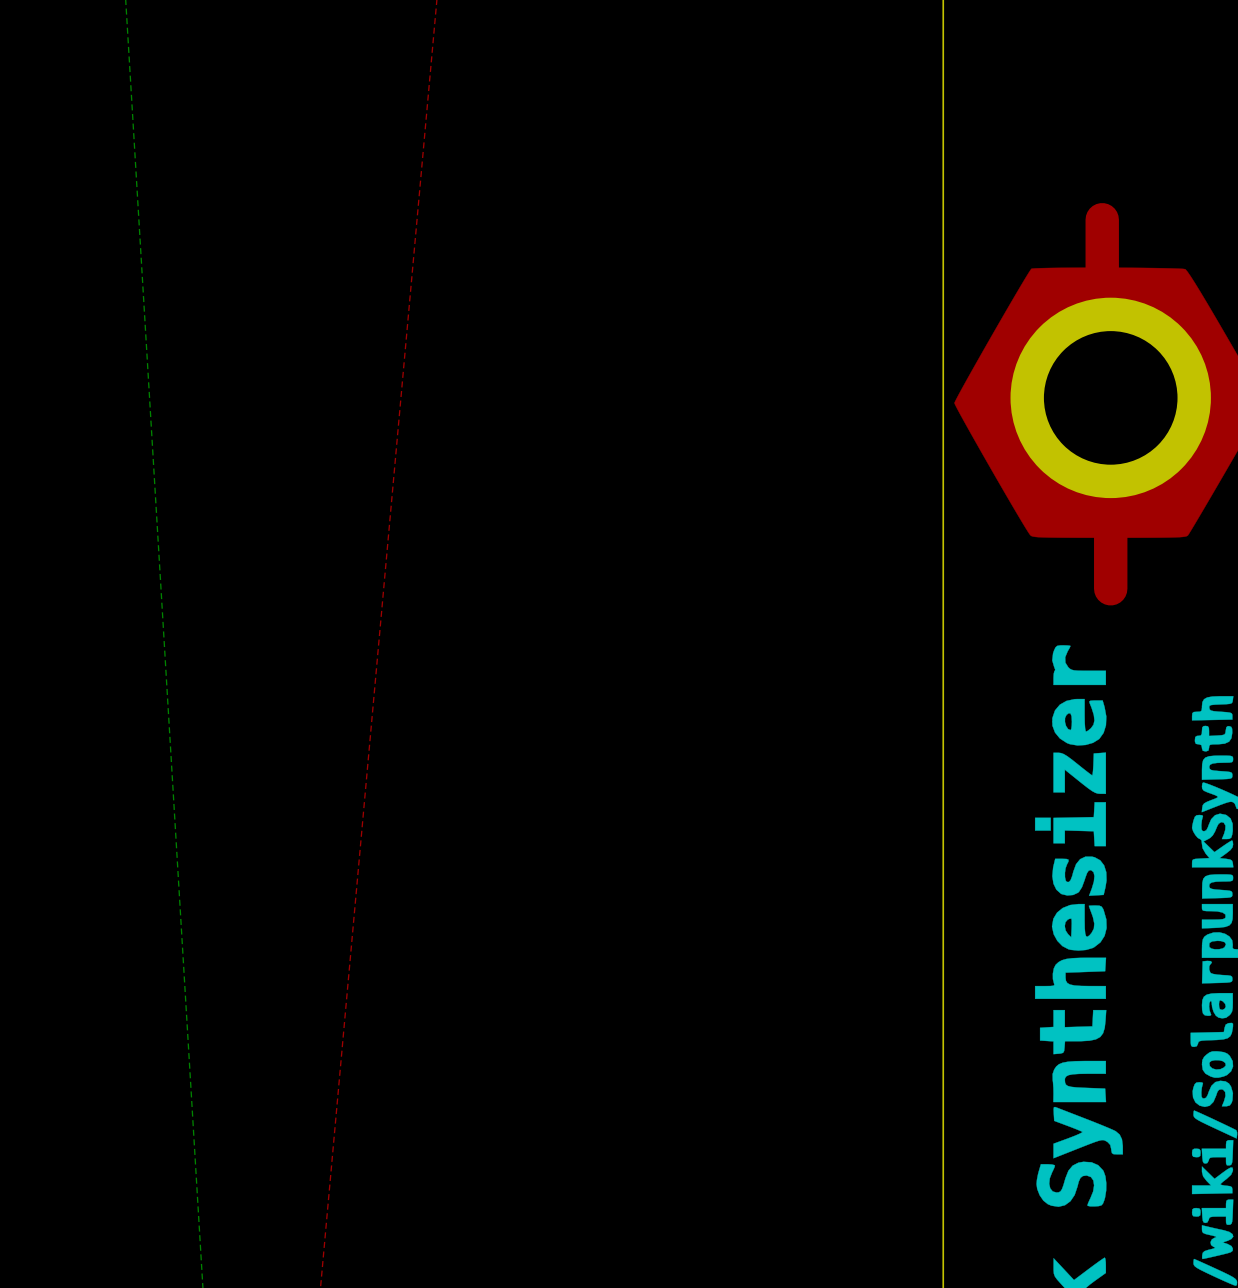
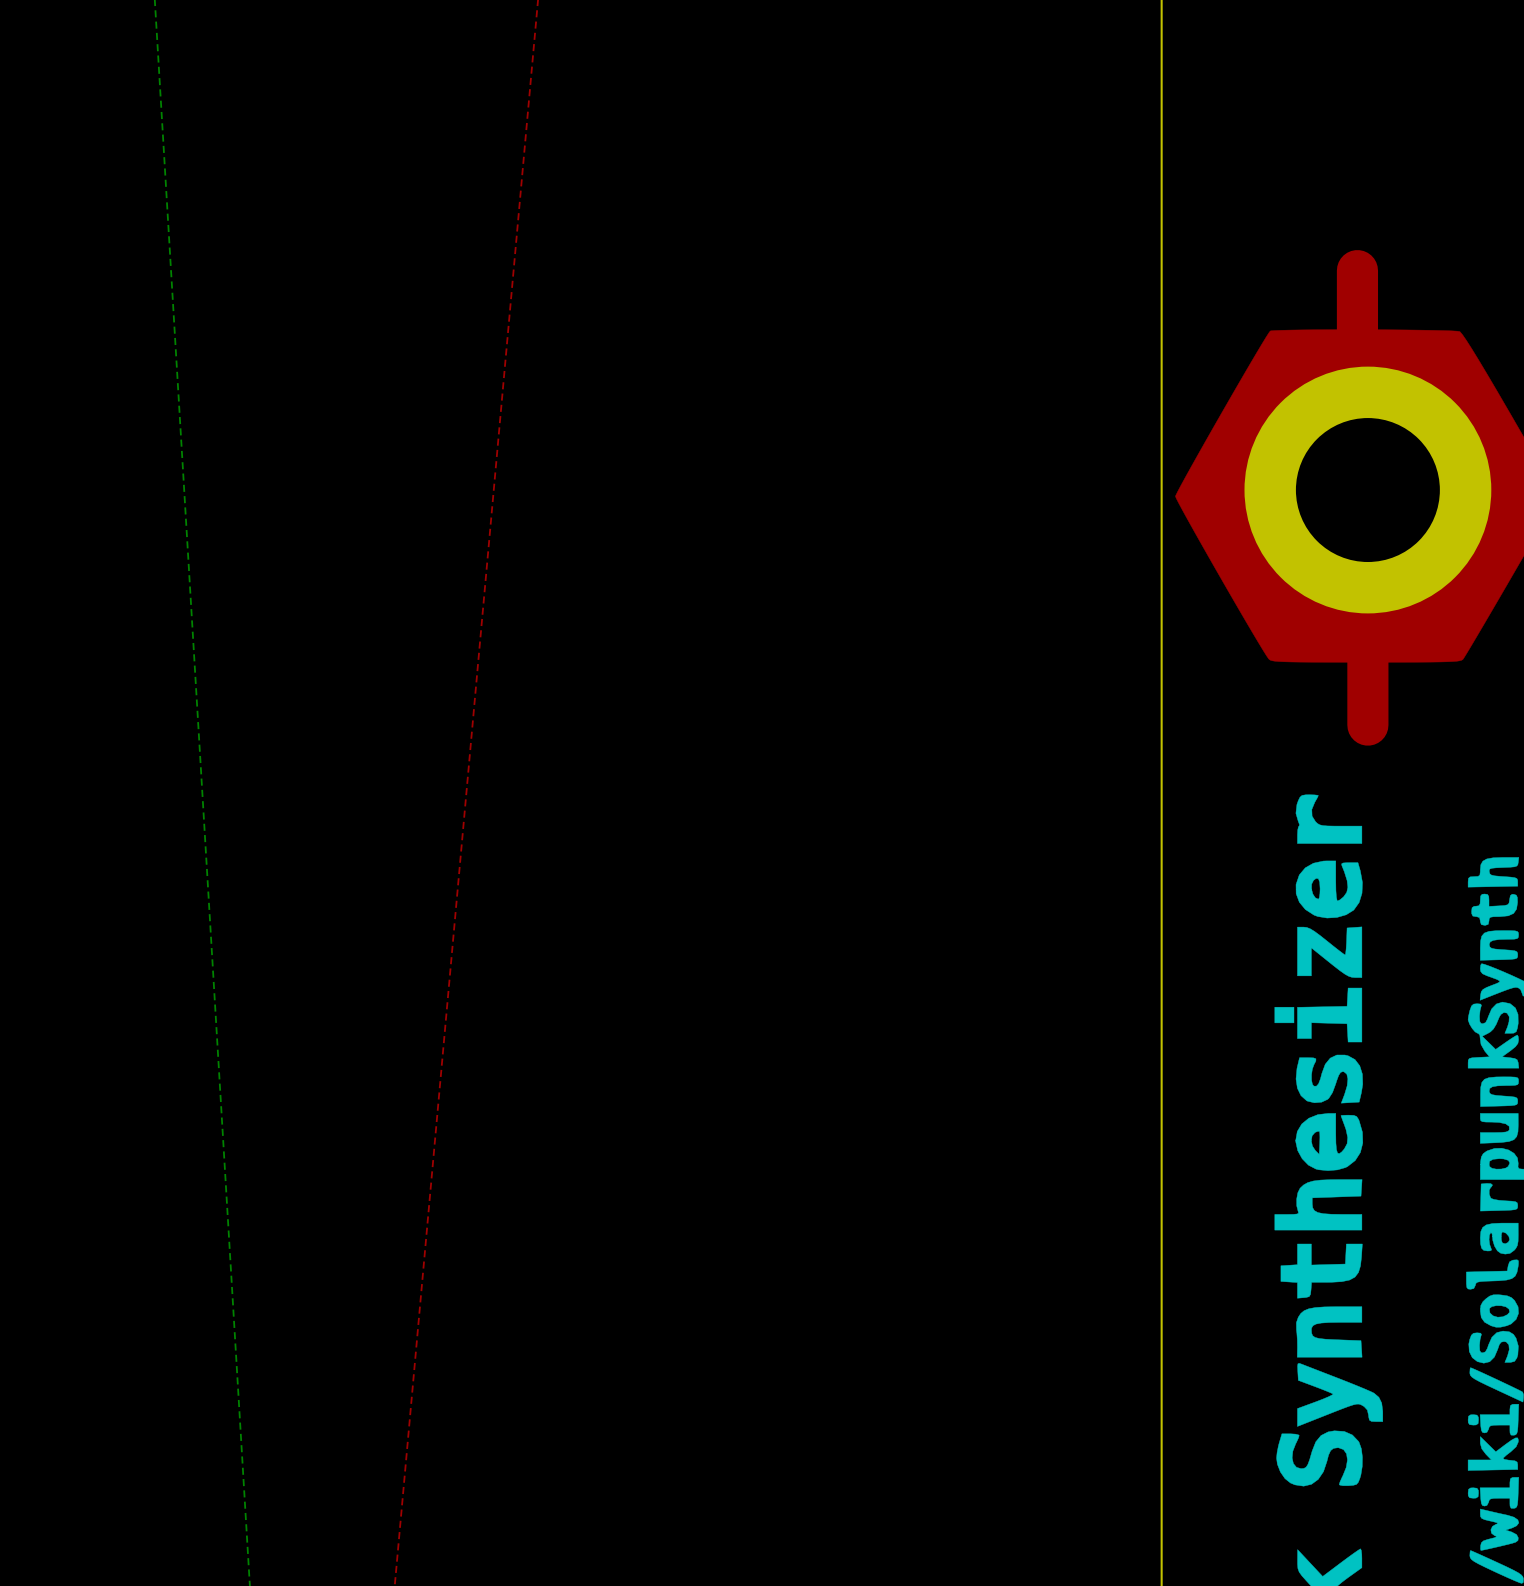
part footprint: [1010, 297, 1211, 499] -> [1244, 366, 1492, 614]

